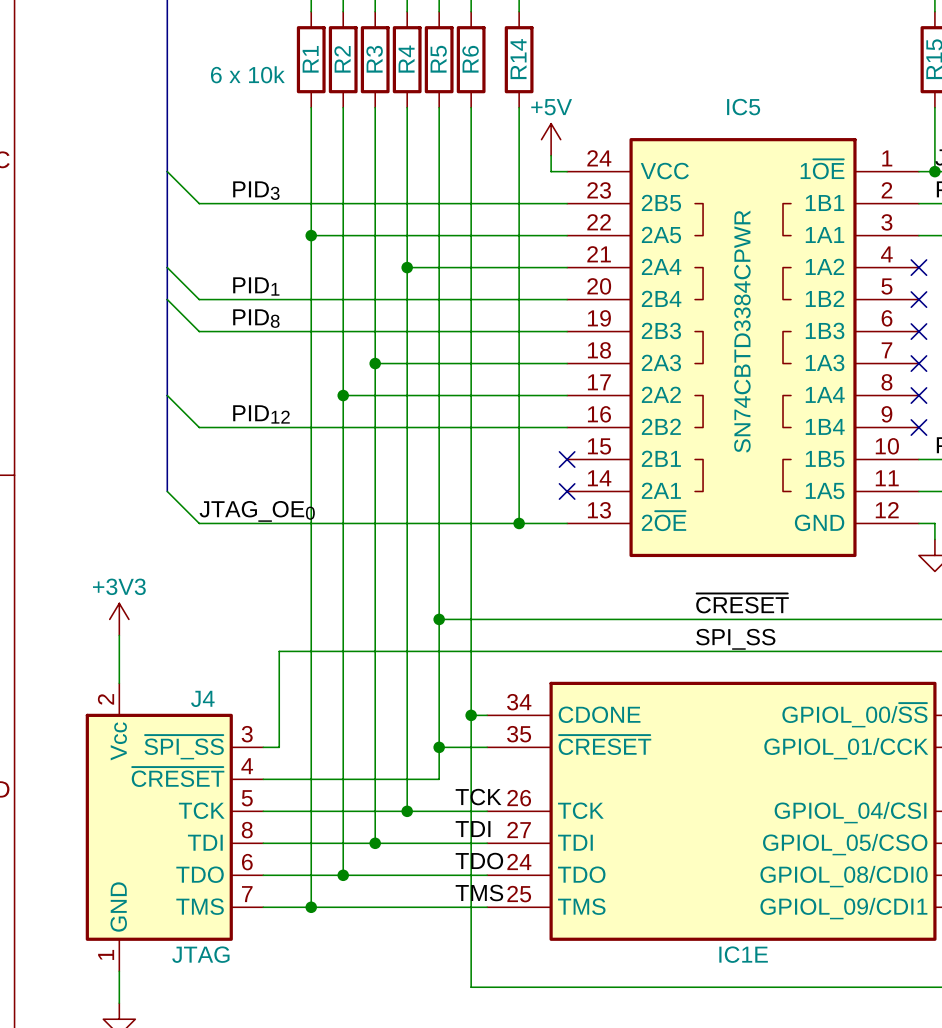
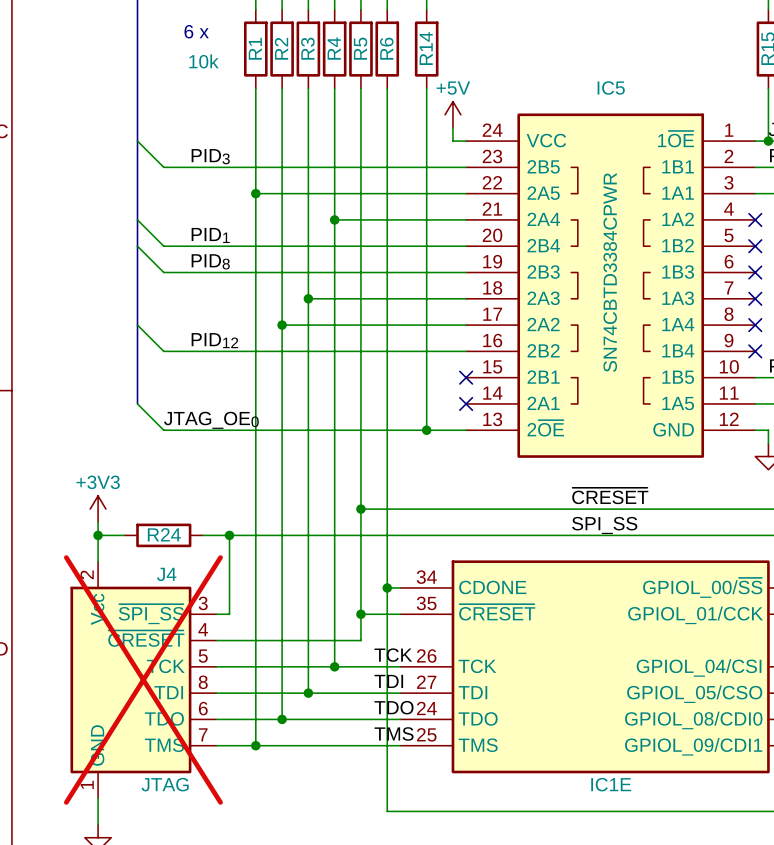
text: none -> 6 x (196, 31)
R1 value: 6 x 10k (247, 74) -> 10k (203, 61)
wire: none -> (98, 535) (124, 535)
junction: none -> (98, 535)
R24: none -> (163, 535)
wire: none -> (203, 535) (229, 535)
junction: none -> (229, 535)
J4 do-not-place cross: none -> (143, 679)

